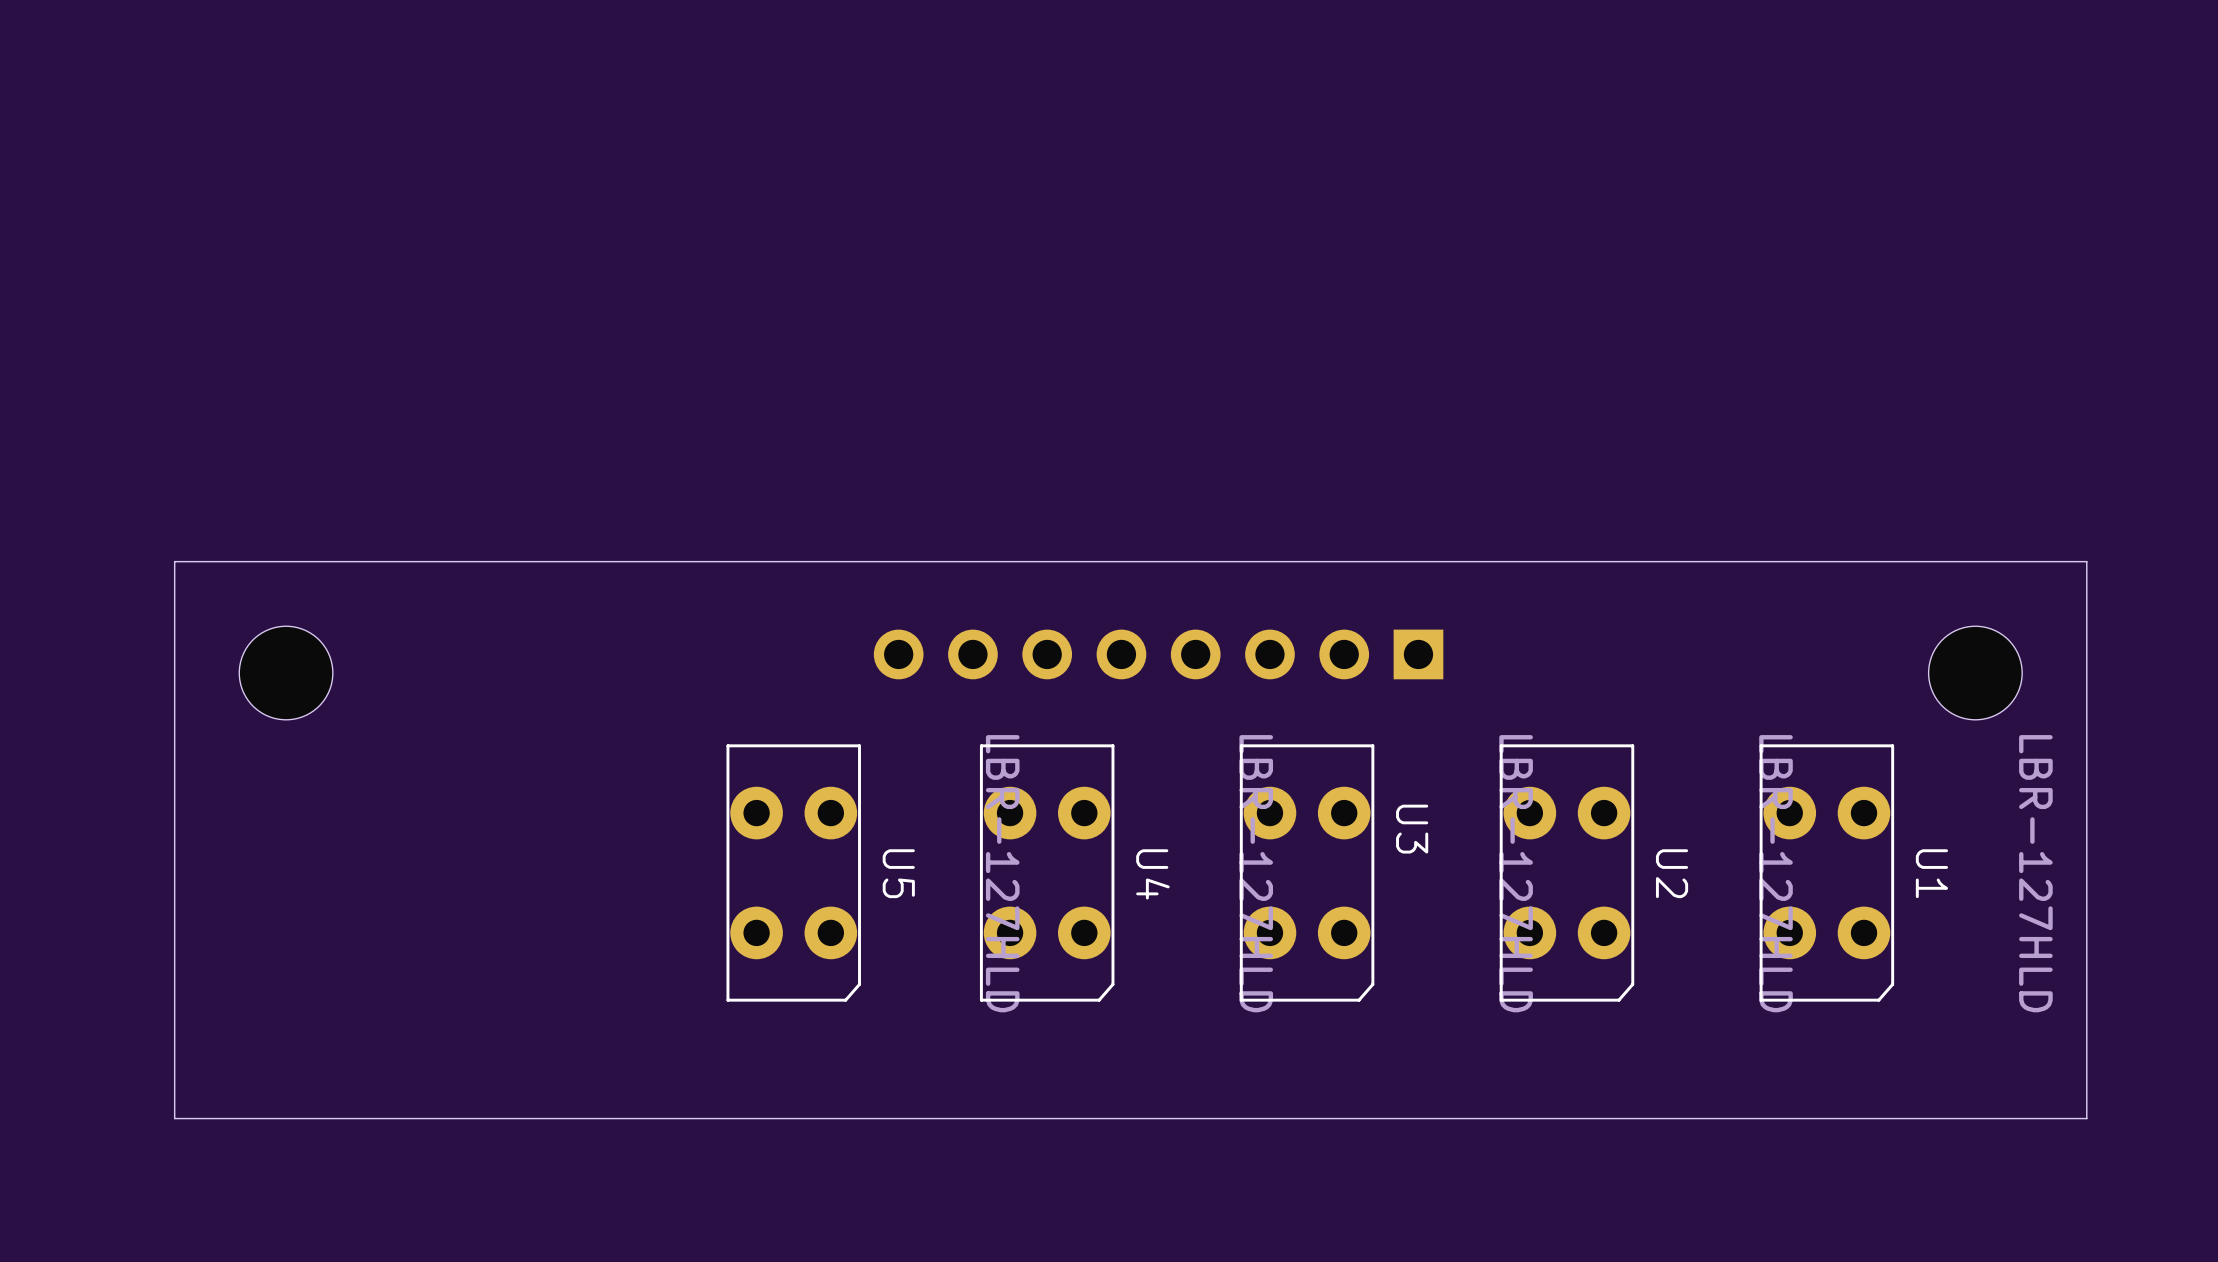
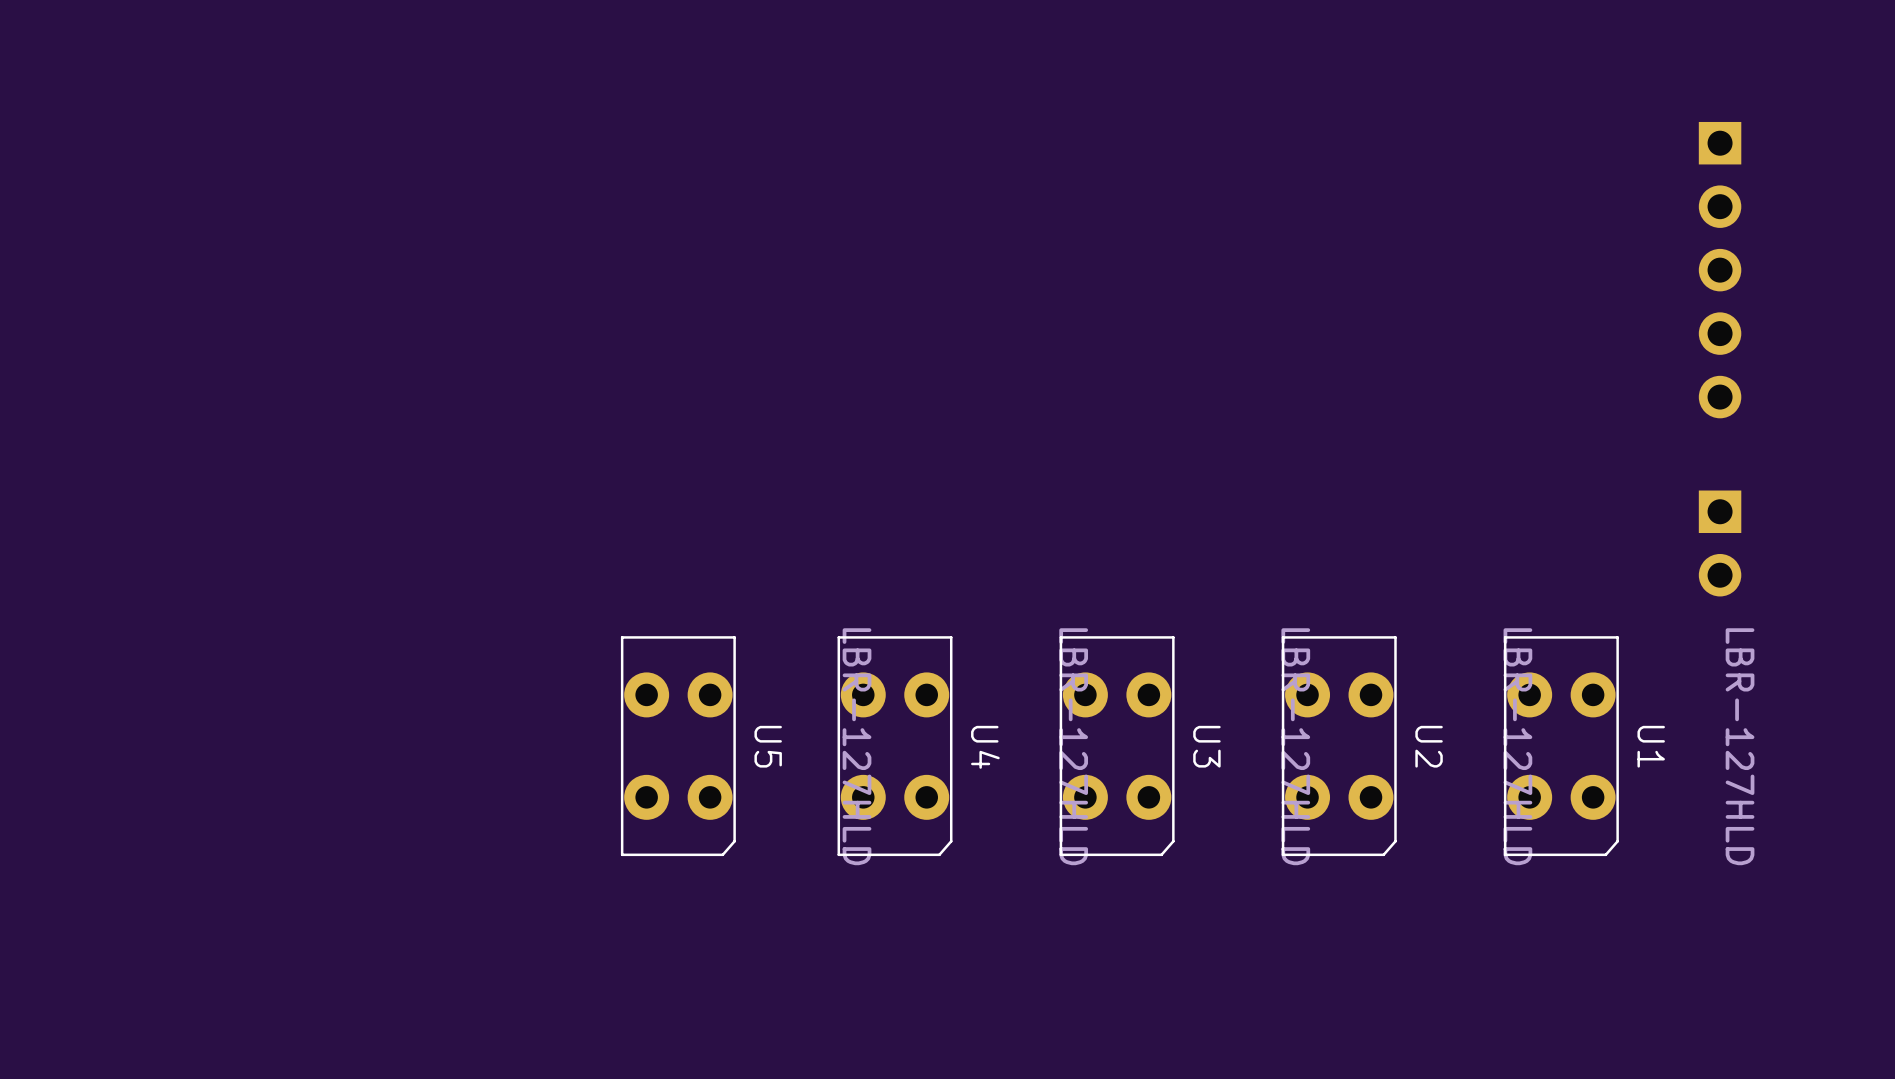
part: none -> (1720, 270)
board edge: (2086, 561) (174, 561) (174, 1118) (2086, 1118) (2086, 561) -> none
part: none -> (1720, 543)
part: (1158, 654) -> none
part: (286, 673) -> none
part: (1975, 673) -> none
U3 name position: U3 (1412, 829) -> U3 (1206, 746)

